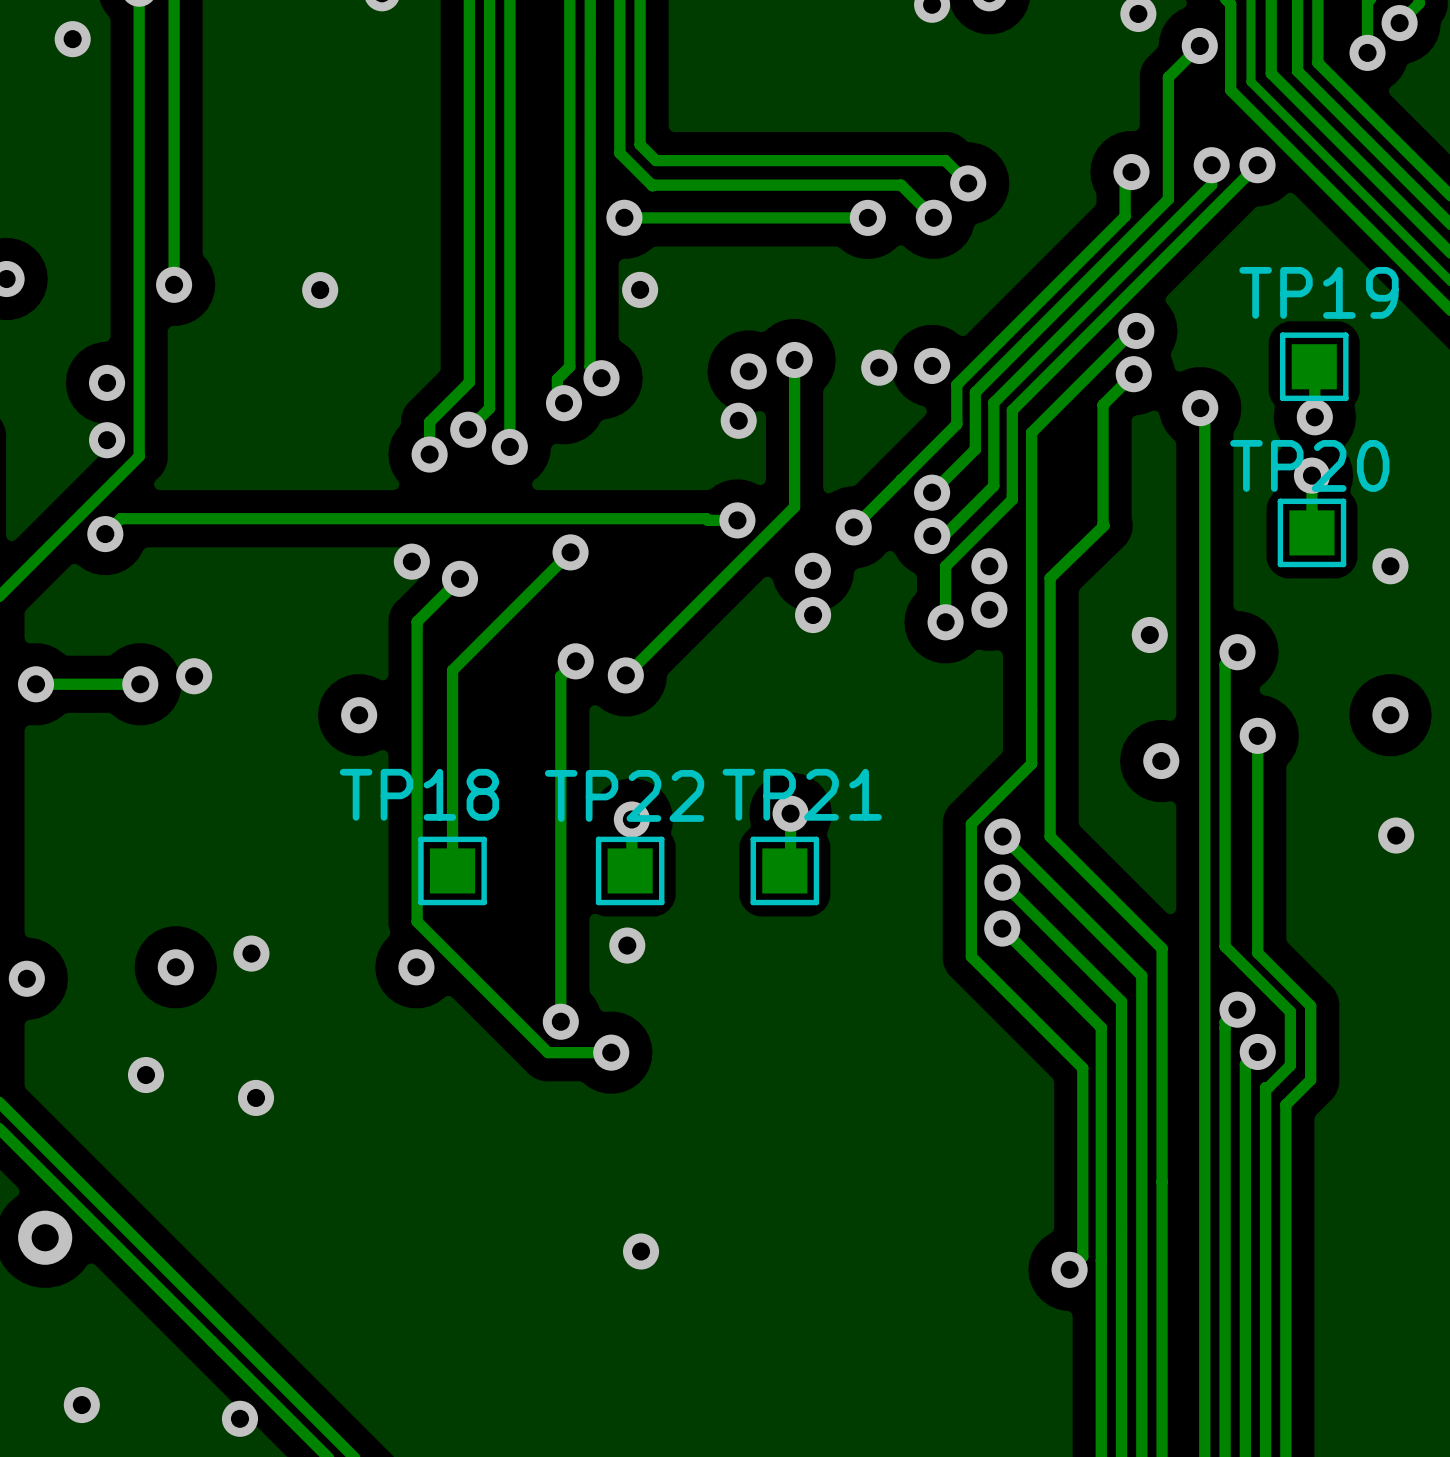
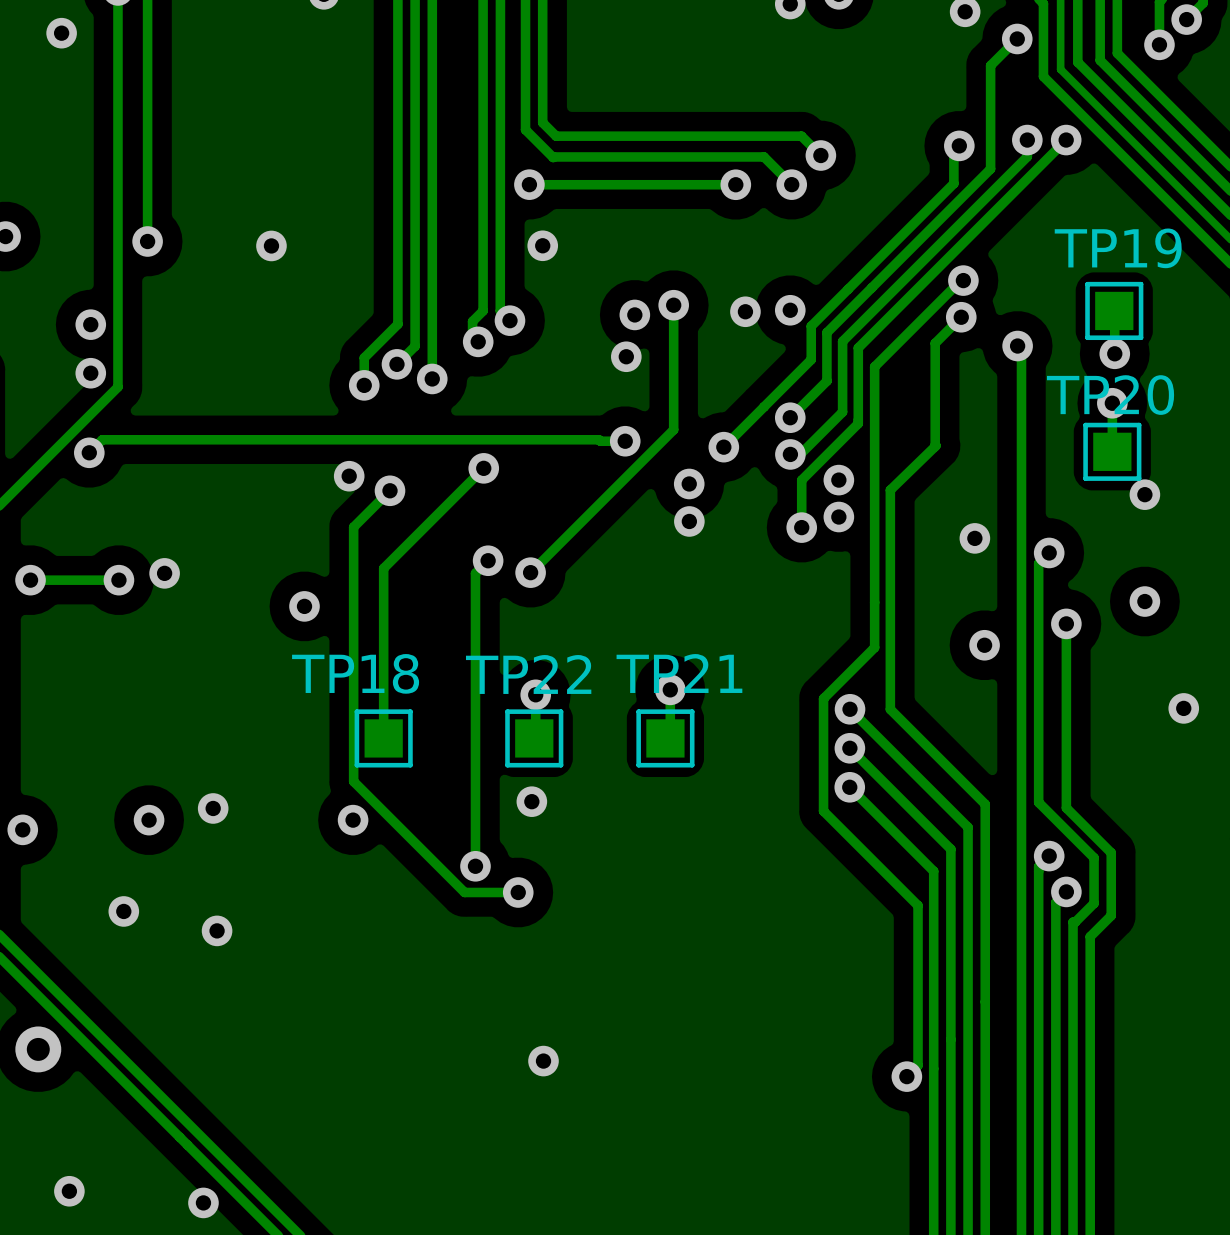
via position: (1390, 566) -> (1144, 494)
via position: (1390, 715) -> (1144, 601)

